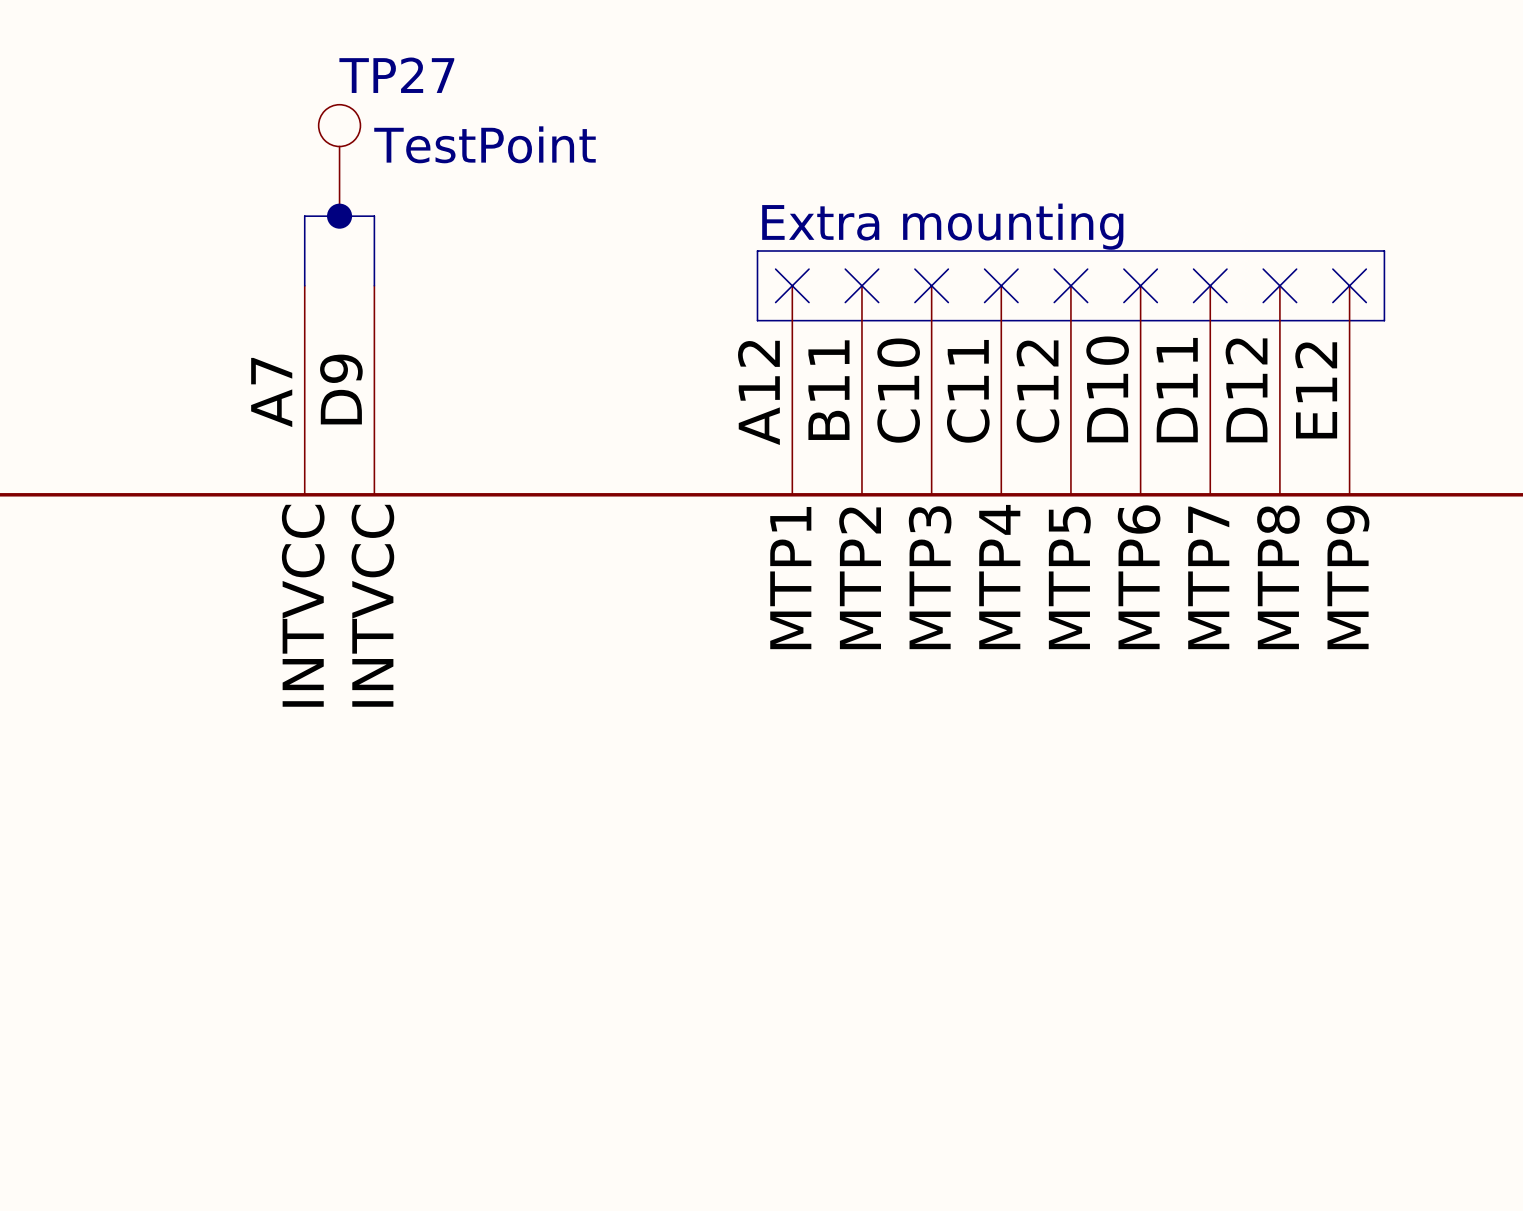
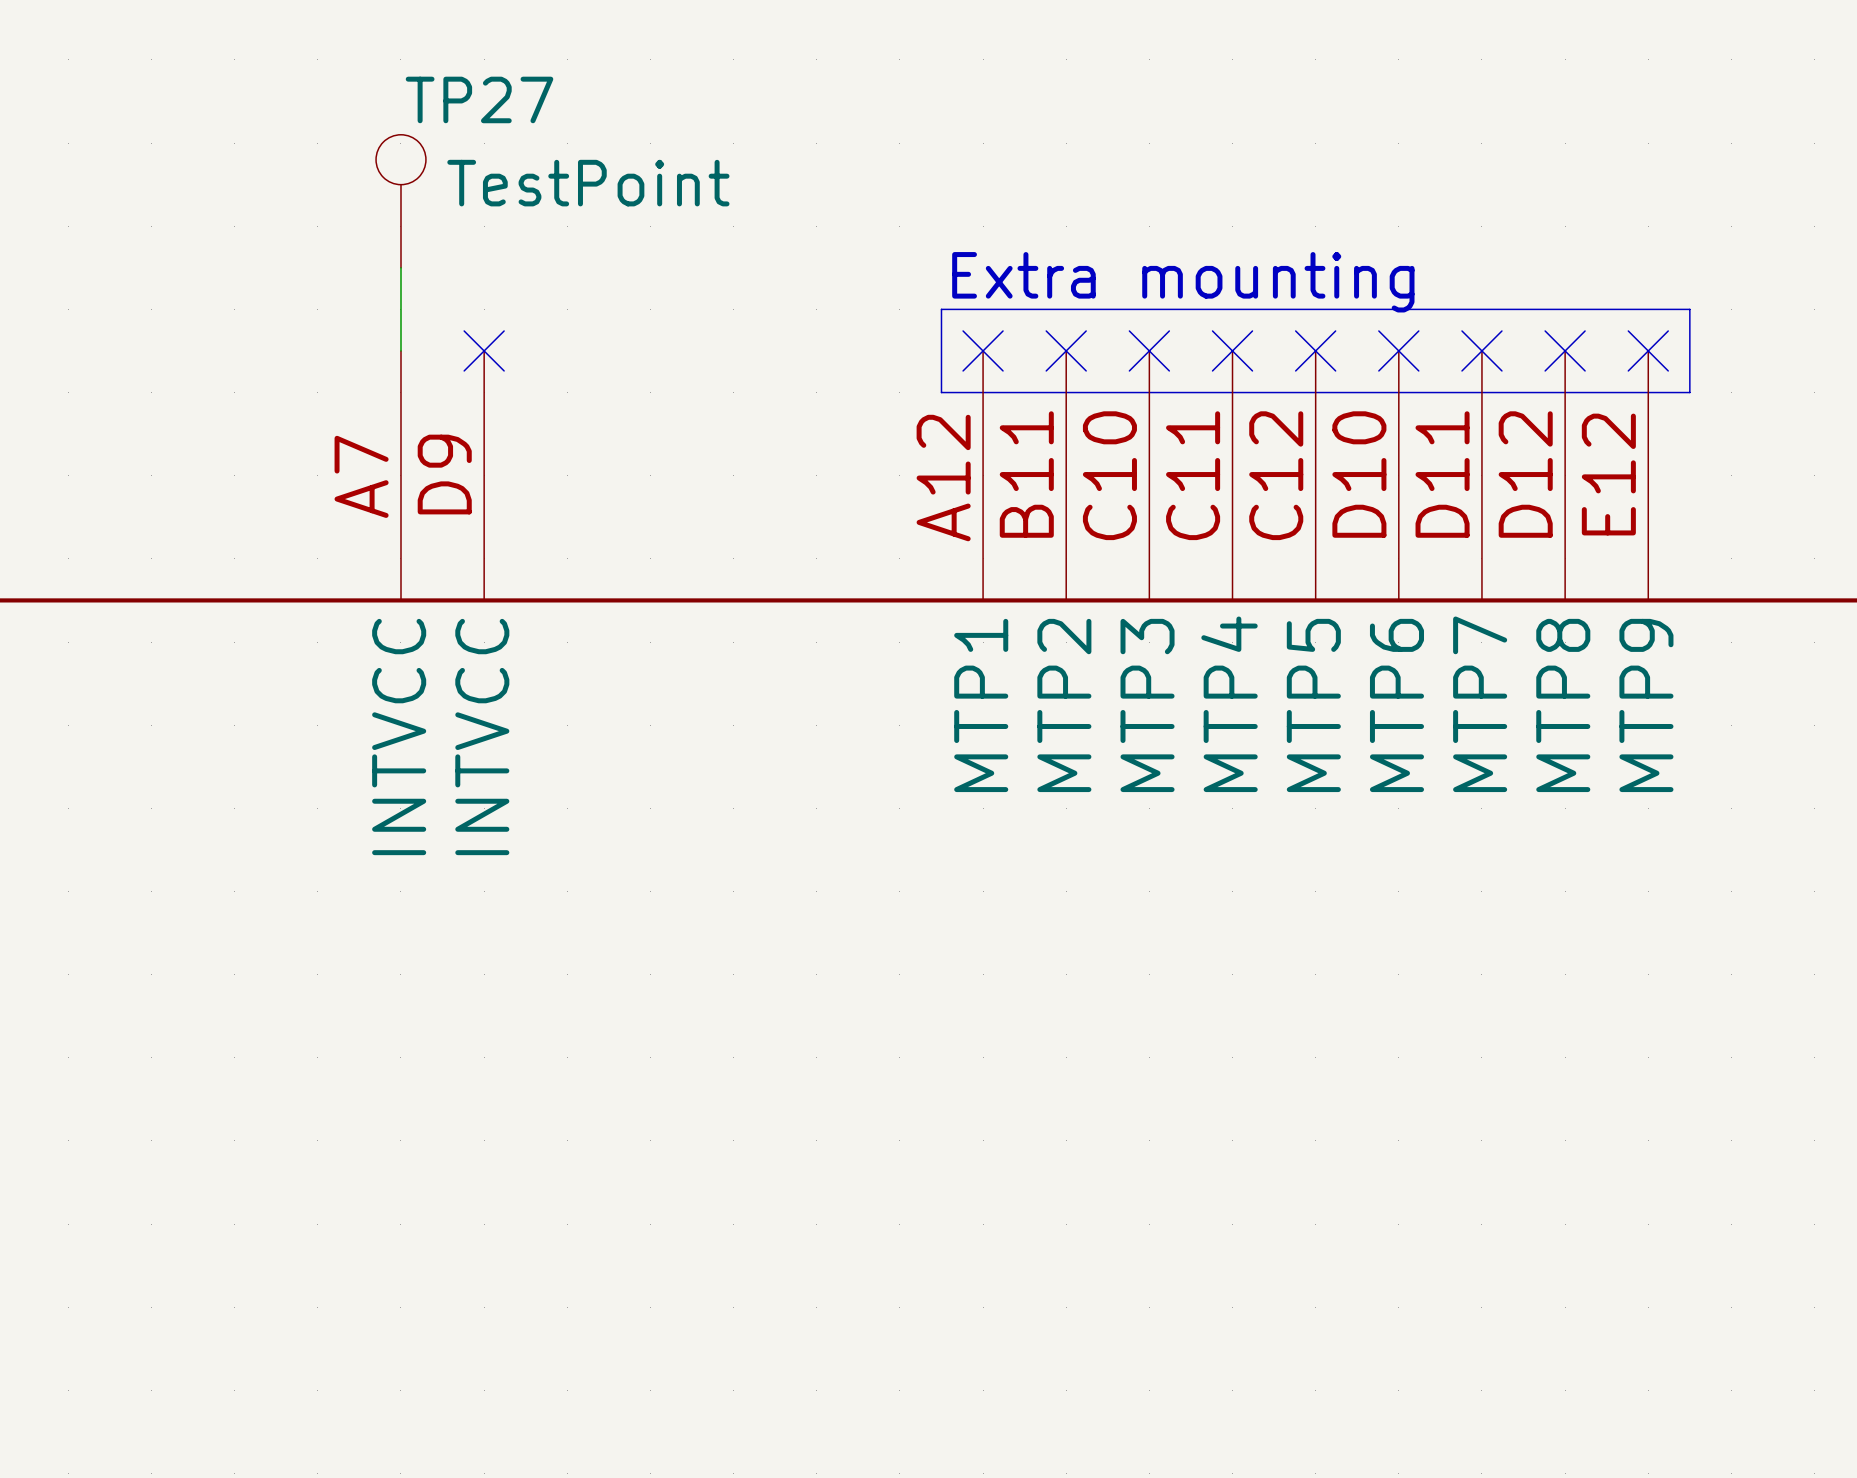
TP27 position: (339, 160) -> (400, 201)
wire: (304, 216) (374, 216) (374, 285) -> none
junction: (339, 216) -> none
no-connect mark: none -> (484, 350)

